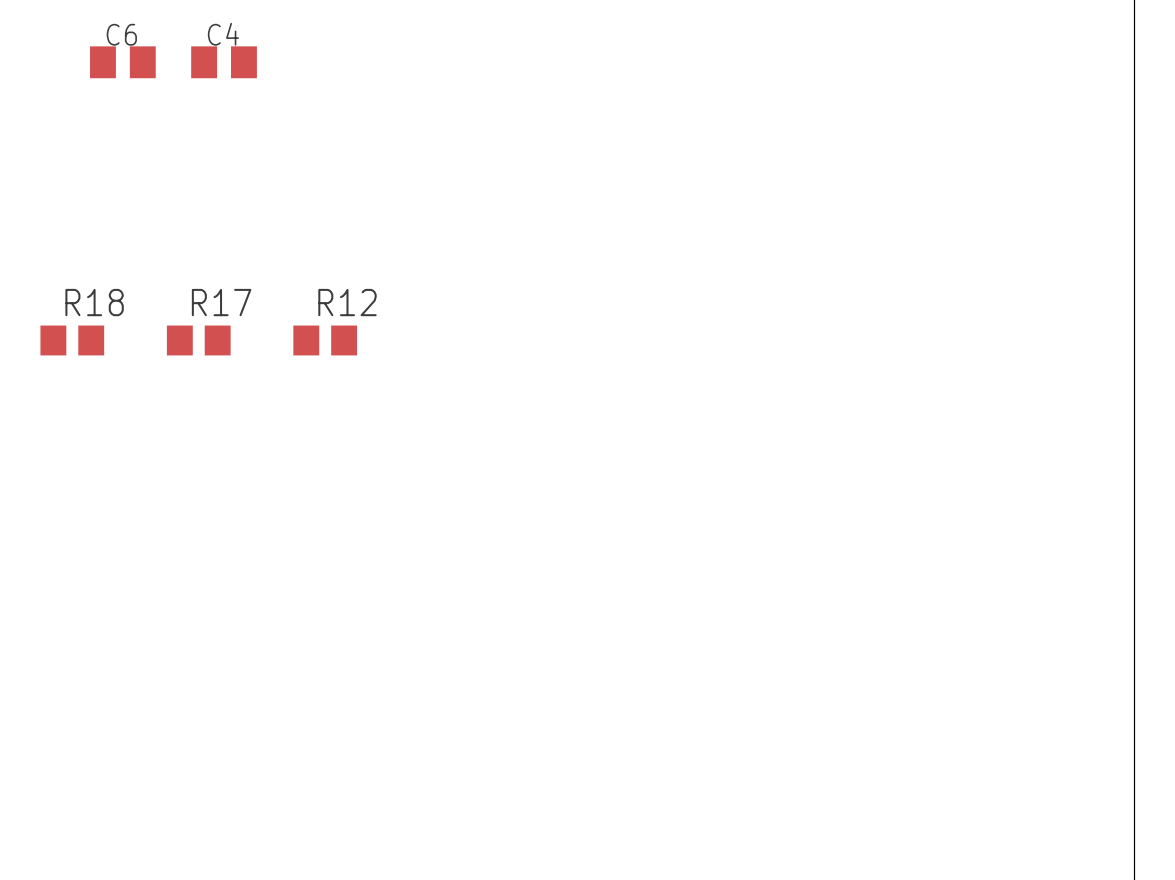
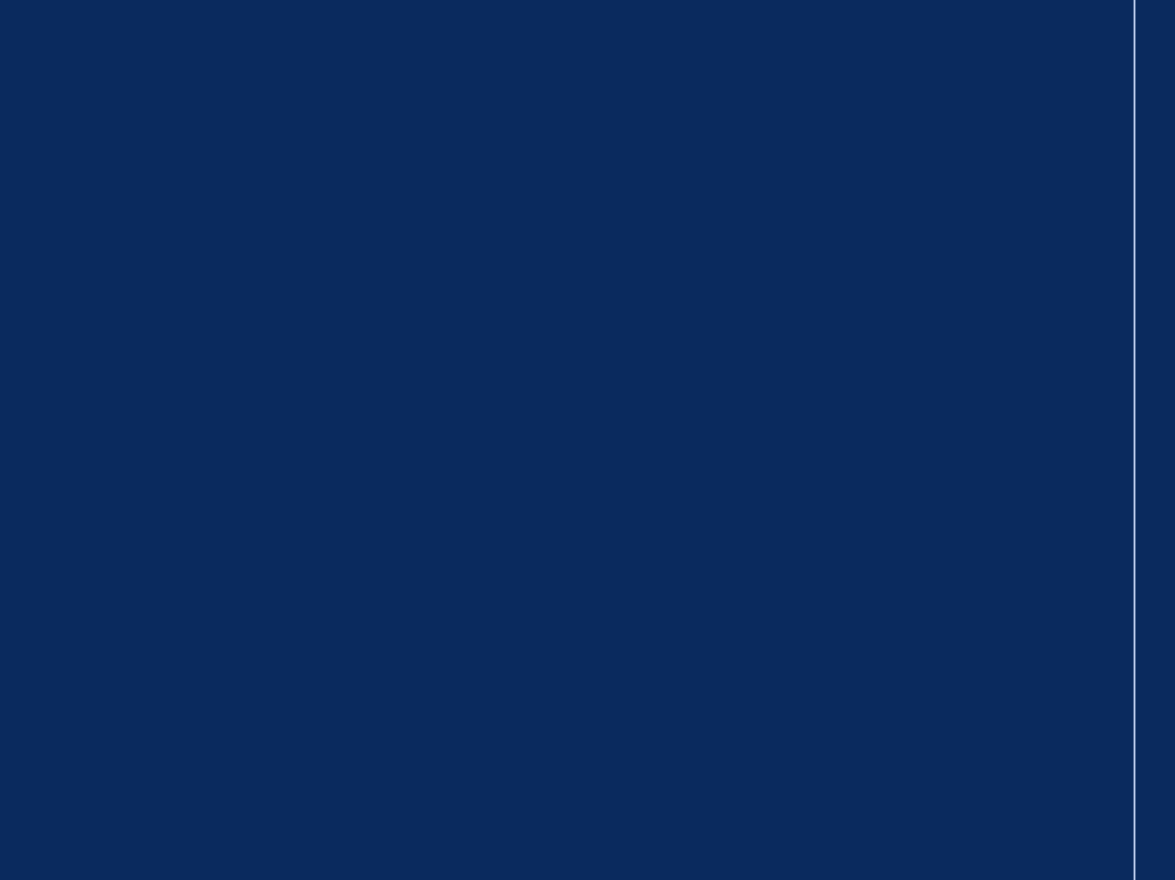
C6: (122, 62) -> none
C4: (224, 62) -> none
R18: (72, 340) -> none
R17: (198, 340) -> none
R12: (325, 340) -> none

